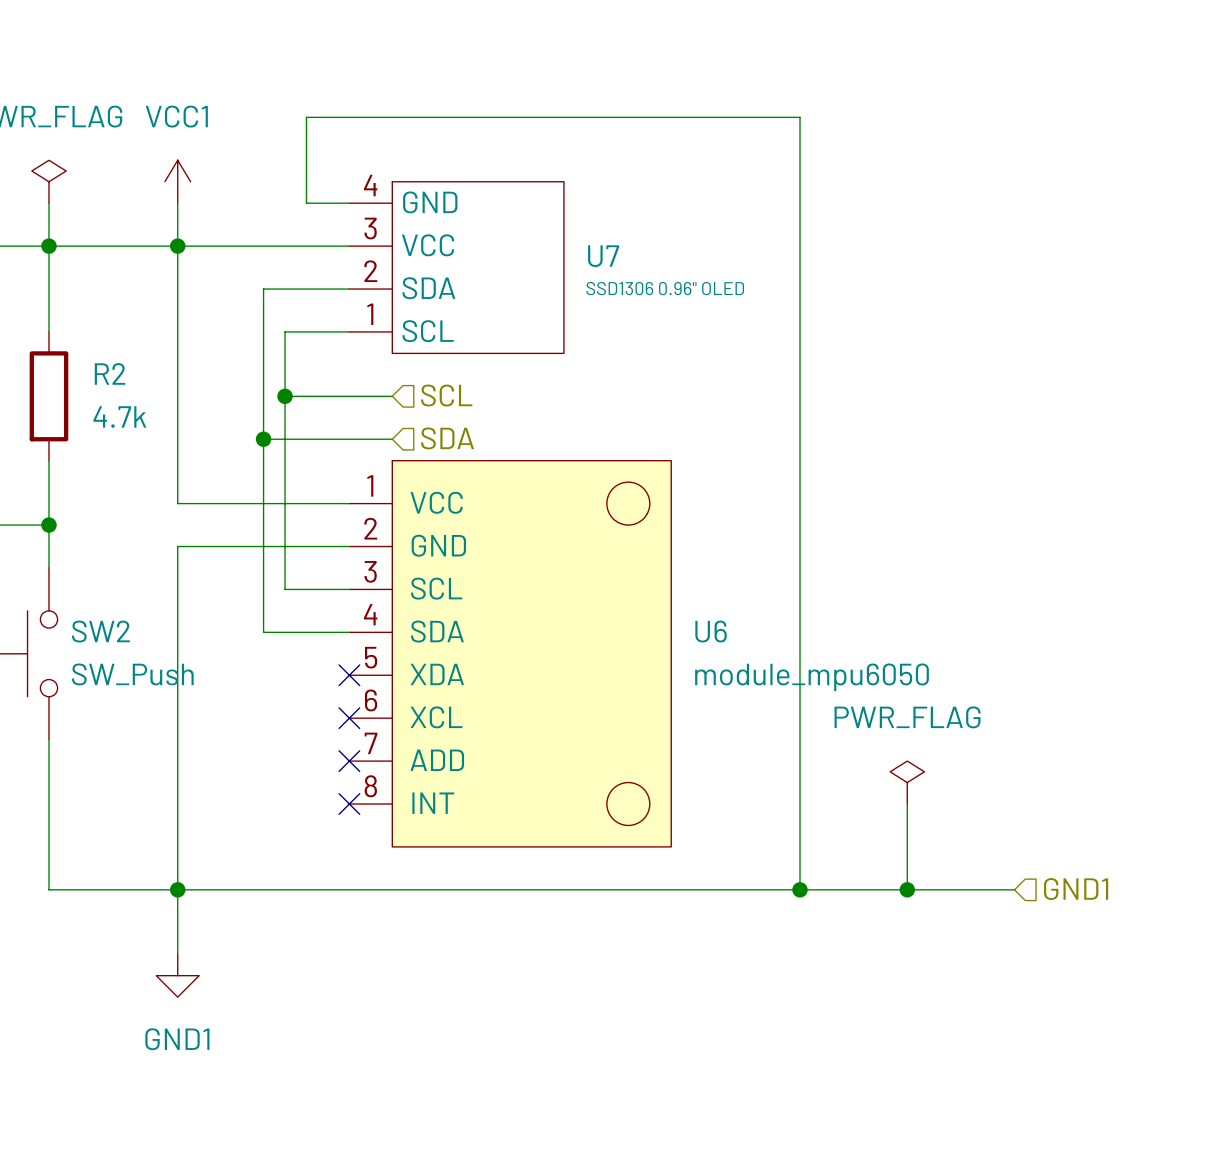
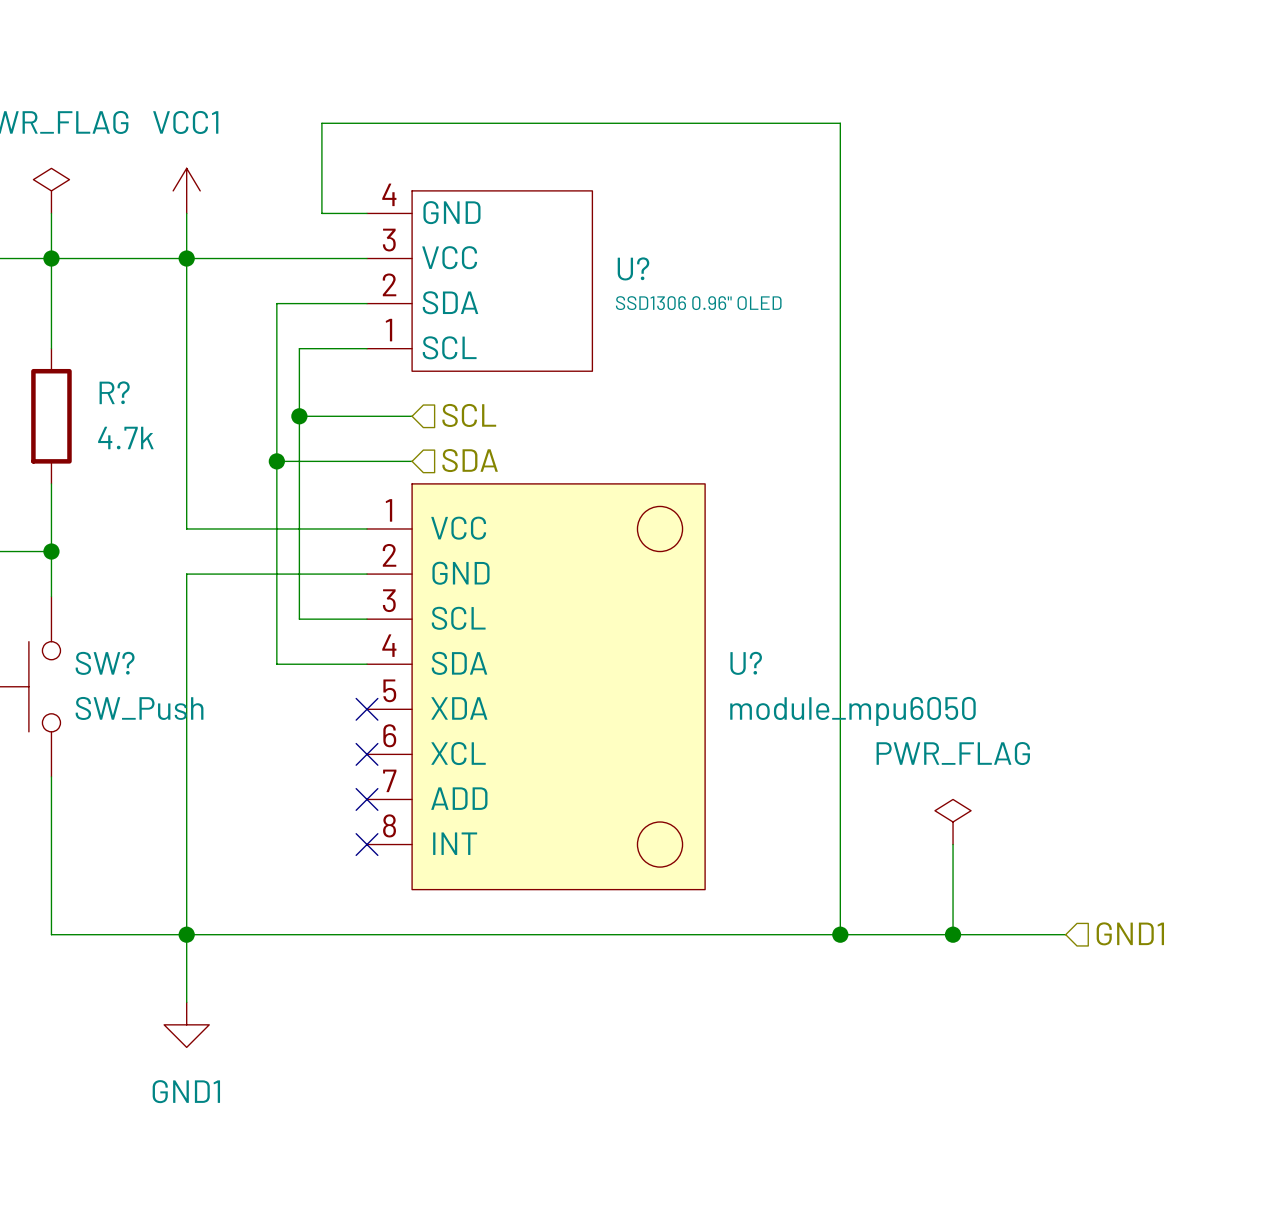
U7 name: U7 (603, 256) -> U? (633, 268)
R2 name: R2 (110, 373) -> R? (114, 392)
SW2 name: SW2 (100, 631) -> SW? (105, 663)
U6 name: U6 (711, 631) -> U? (746, 663)

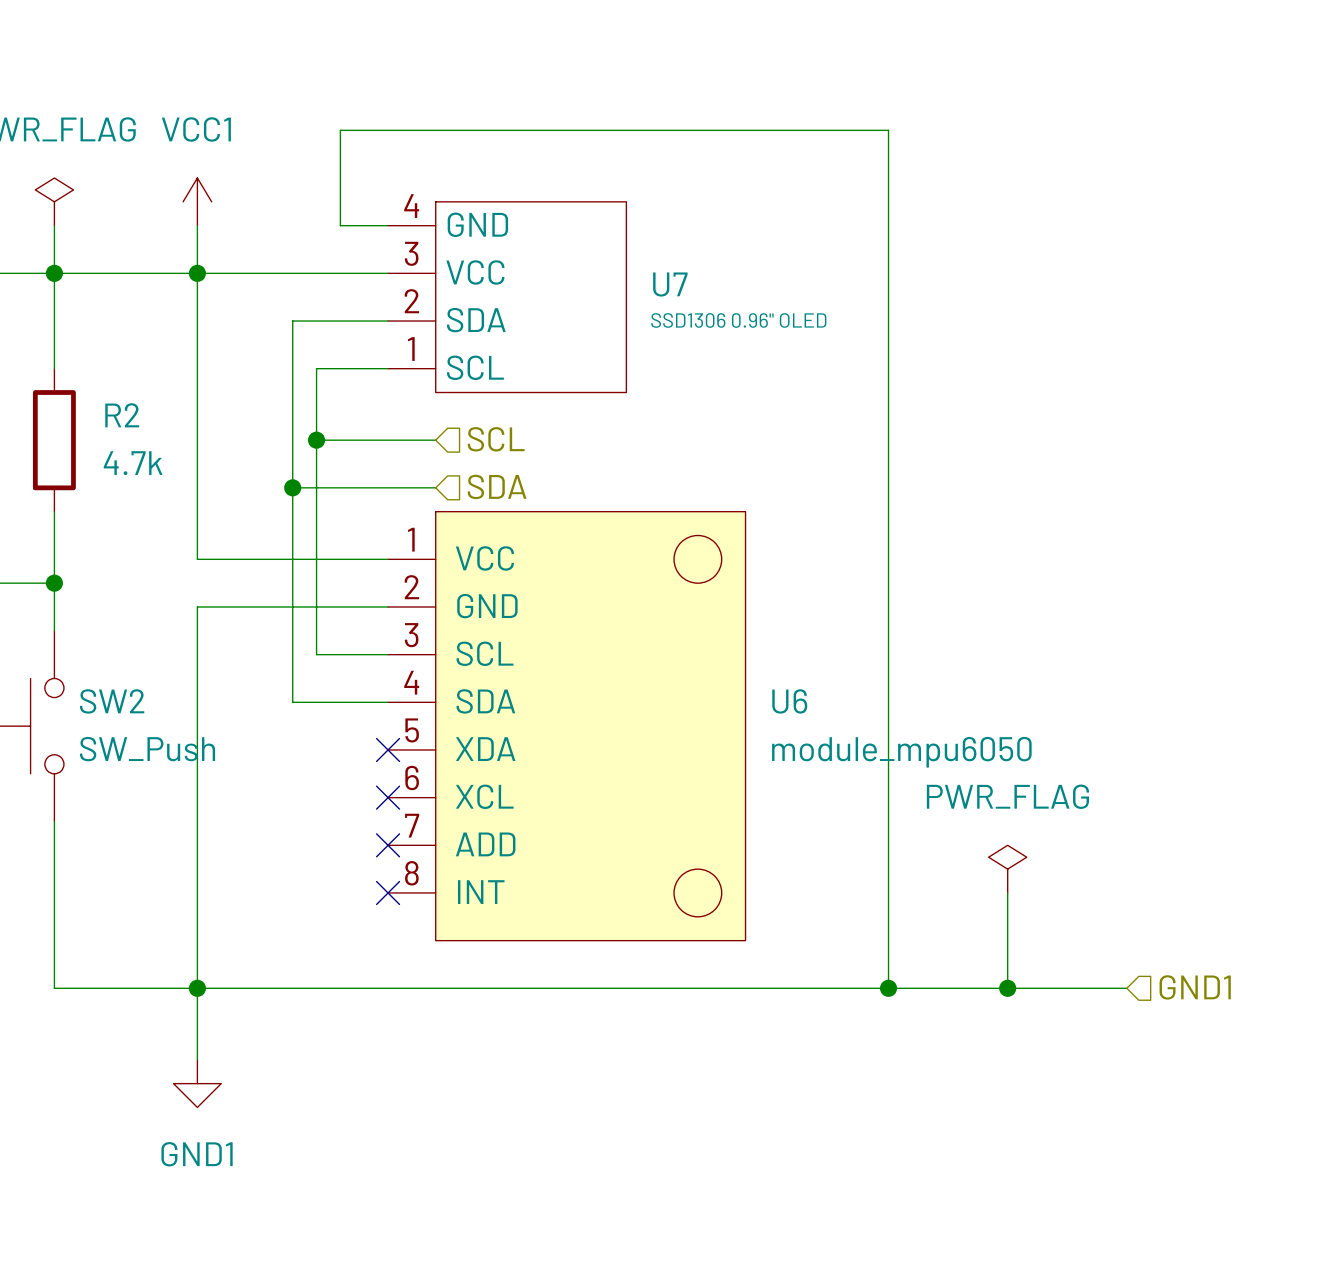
U? name: U? (633, 268) -> U7 (670, 284)
R? name: R? (114, 392) -> R2 (122, 415)
SW? name: SW? (105, 663) -> SW2 (112, 701)
U? name: U? (746, 663) -> U6 (789, 701)

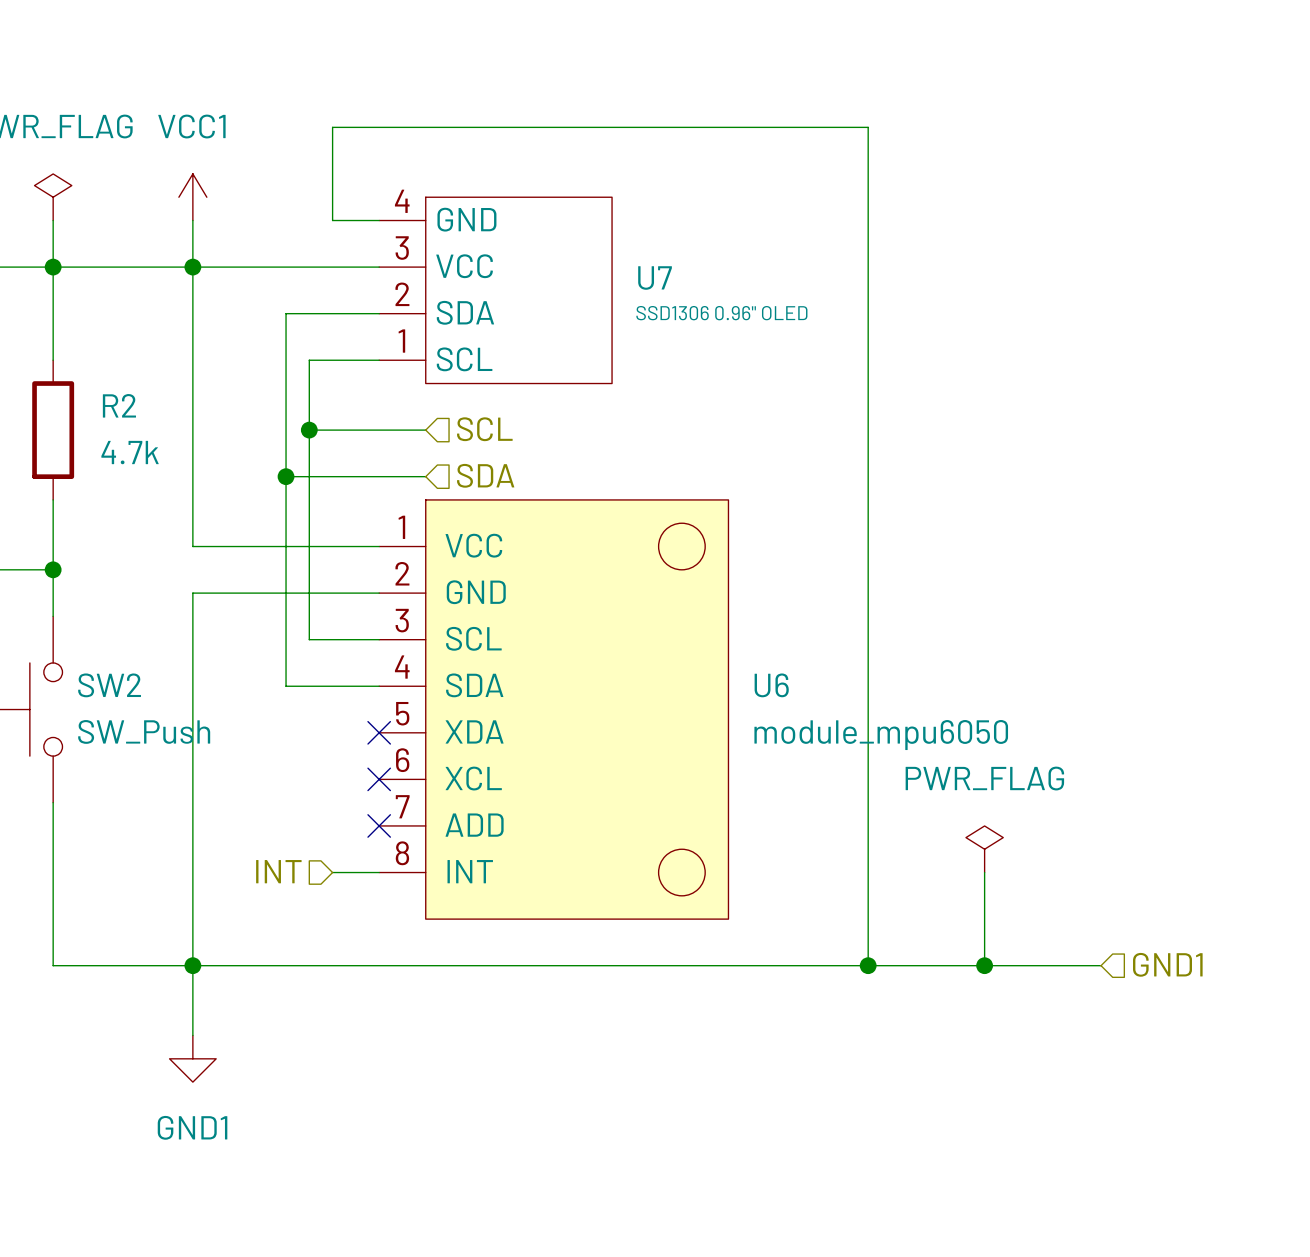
hierarchical label: none -> INT (278, 871)
wire: none -> (332, 872) (379, 872)
no-connect mark: (388, 892) -> none

